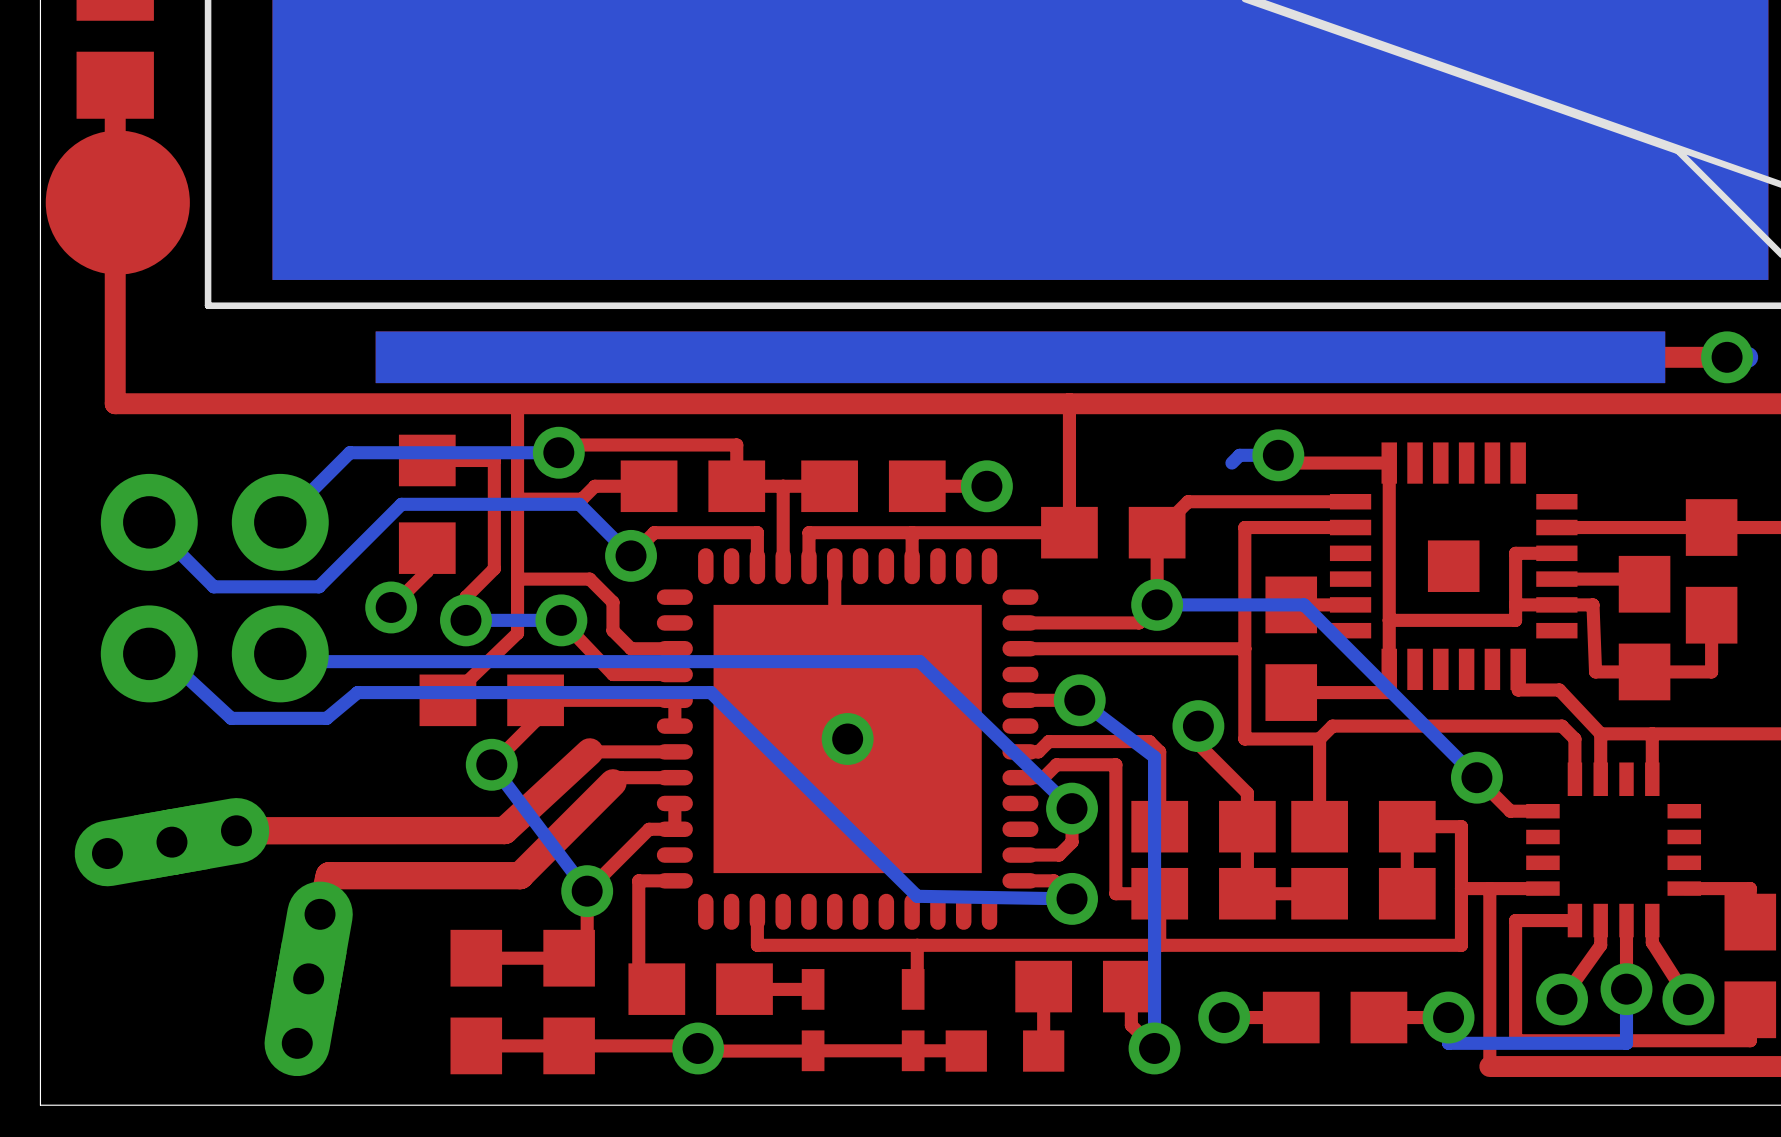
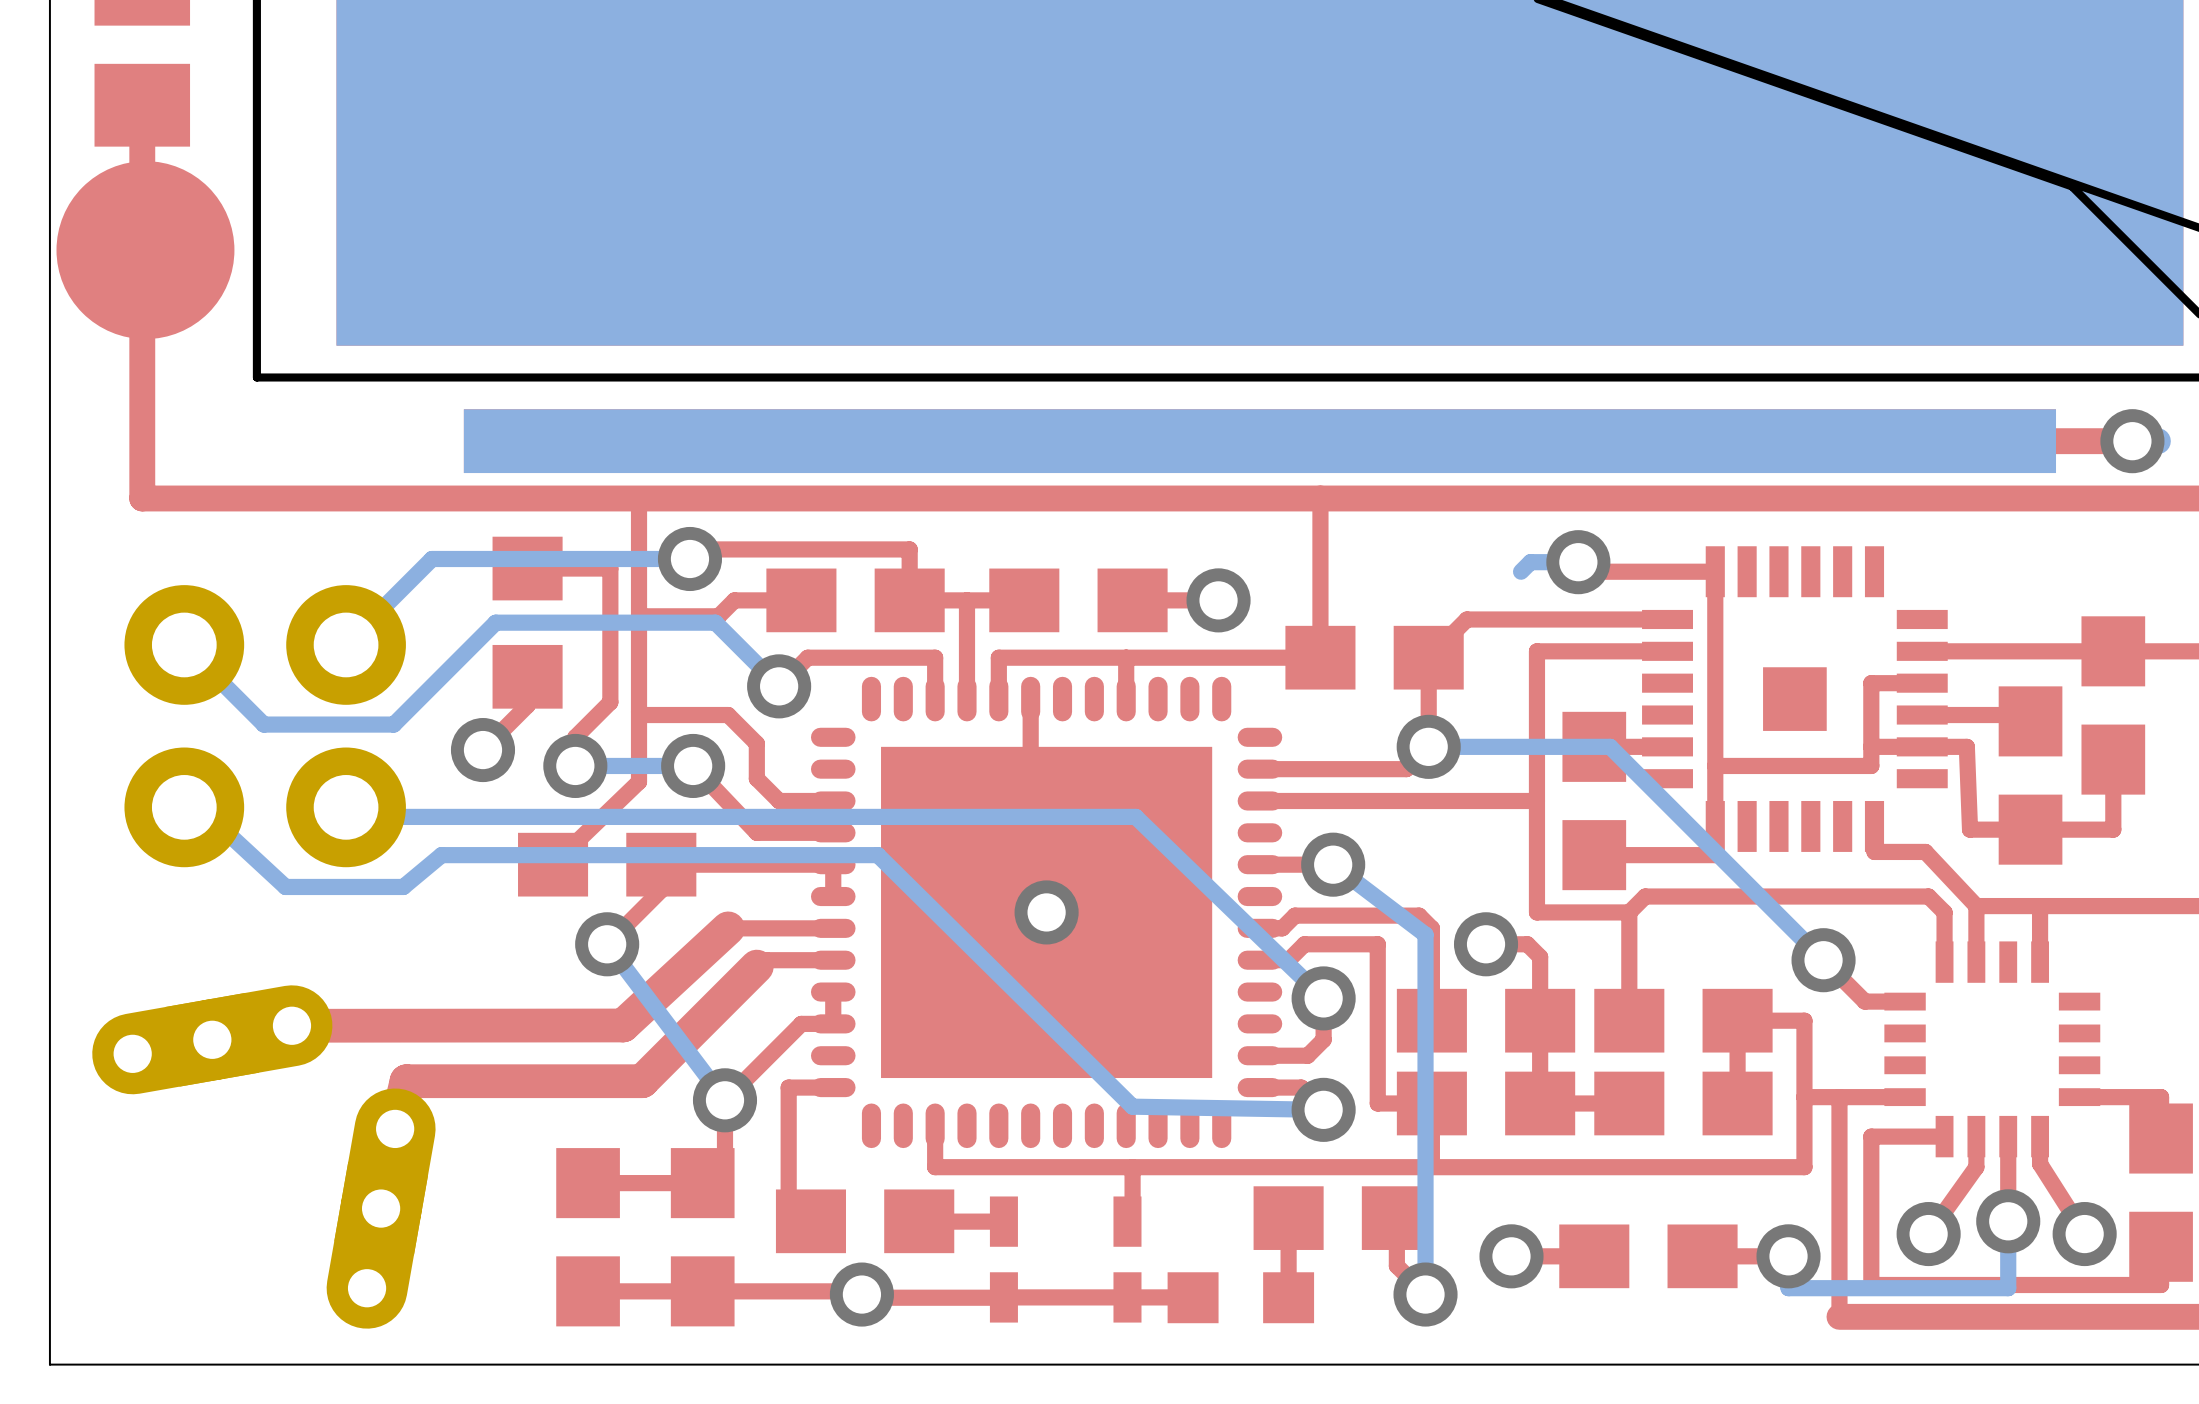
top track: (1198, 726) (1198, 744) (1247, 793) -> (1486, 944) (1527, 944) (1540, 957) (1540, 979)
via position: (1198, 726) -> (1486, 944)

